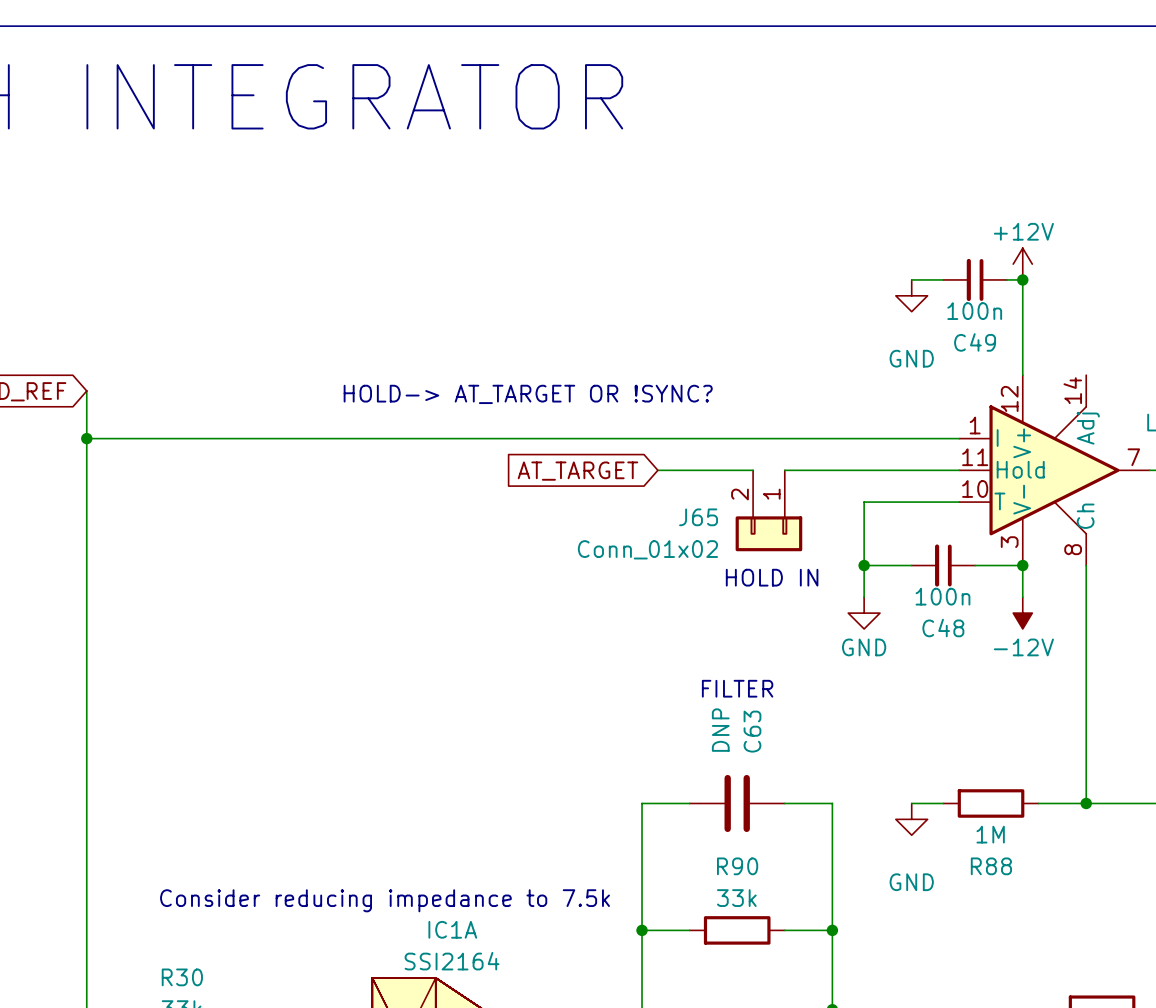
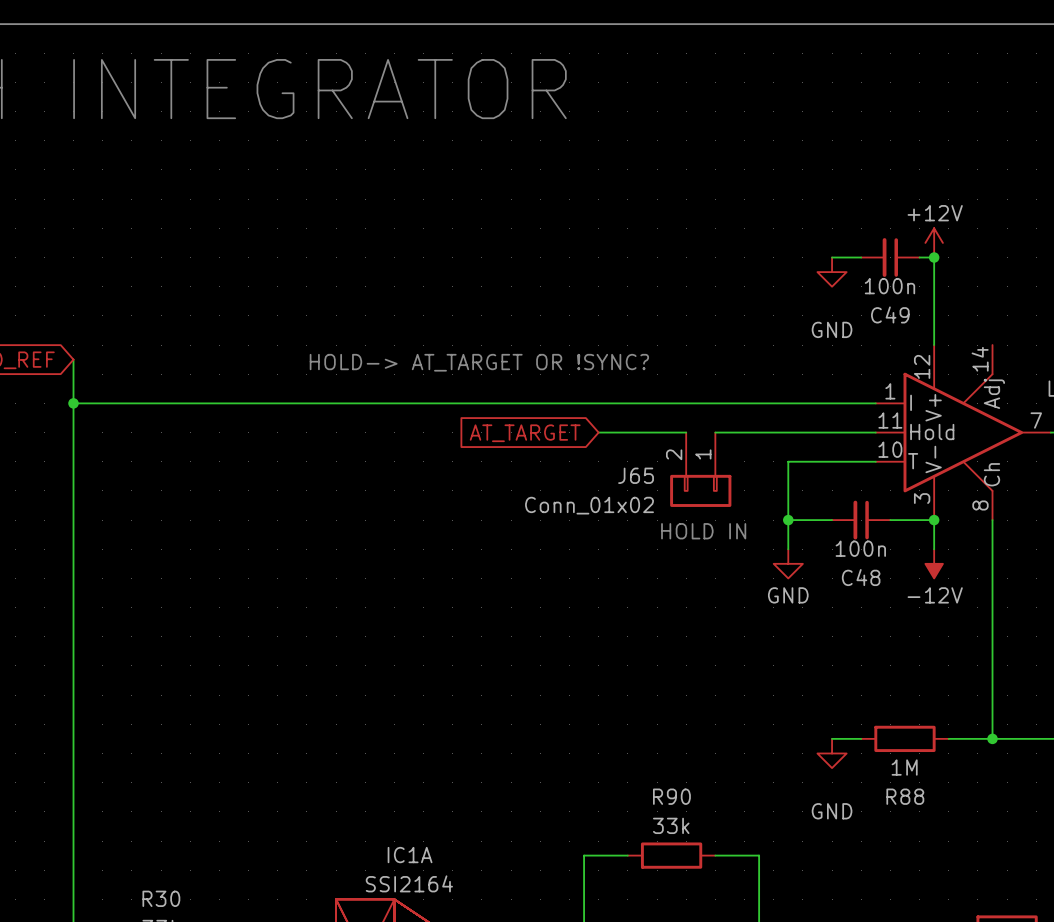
text: FILTER (737, 688) -> none
wire: (689, 803) (642, 803) (642, 930) -> none
C63: DNP (737, 803) -> none
wire: (784, 803) (832, 803) (832, 930) -> none
text: Consider reducing impedance to 7.5k (385, 900) -> none
junction: (642, 930) -> none
junction: (832, 930) -> none

